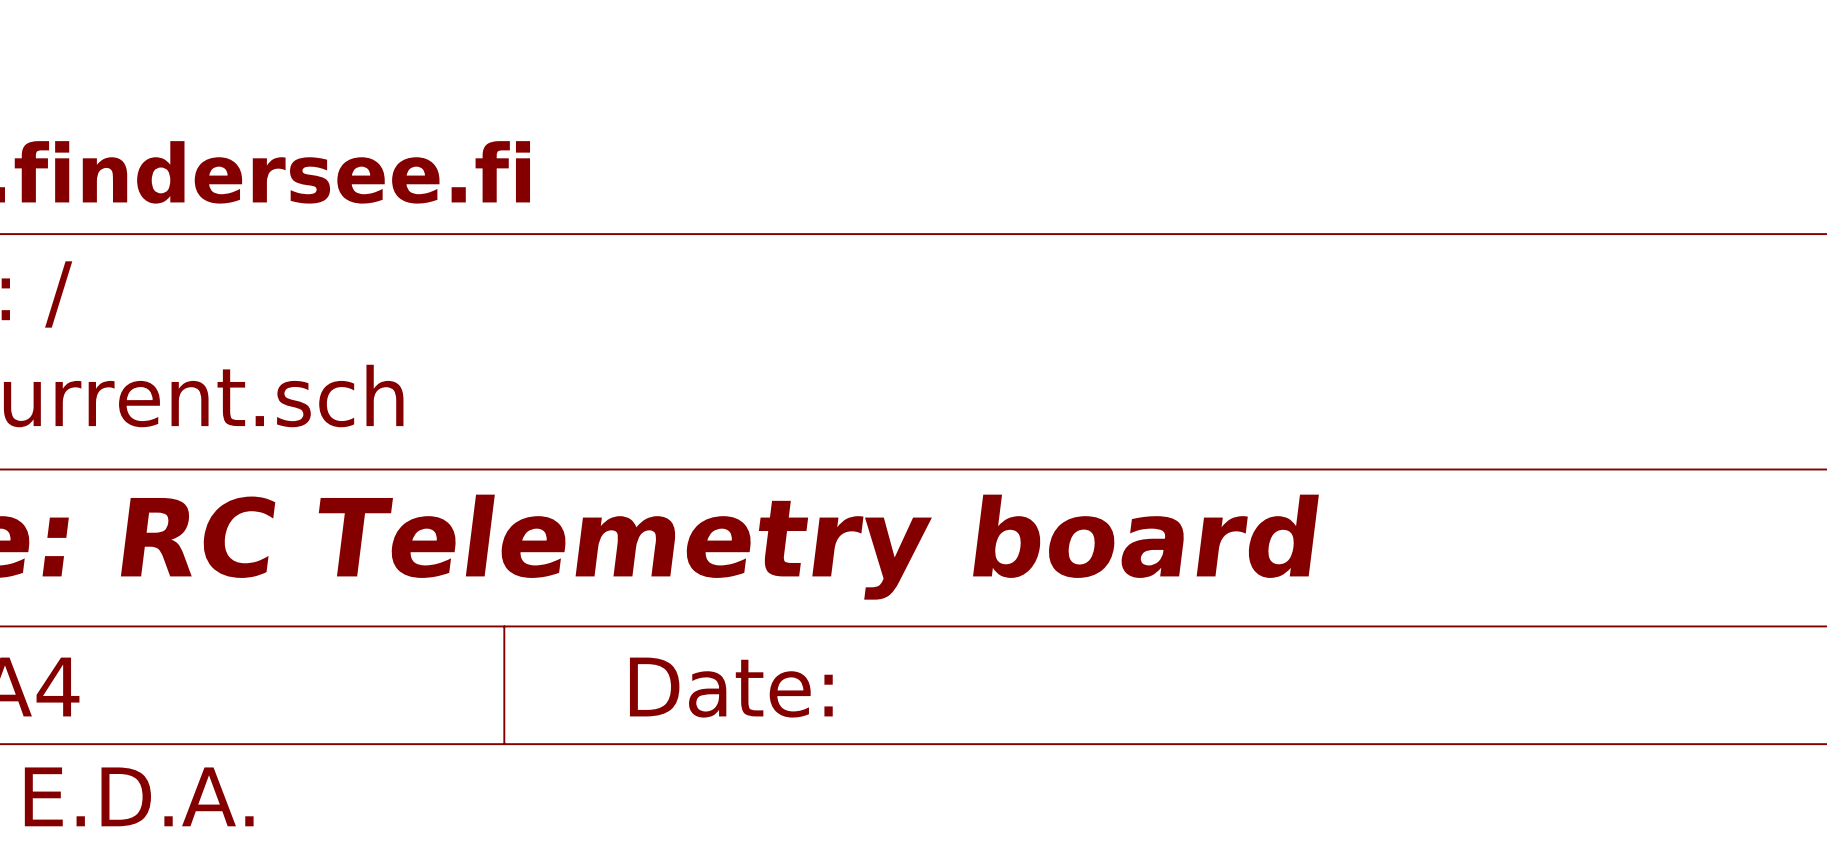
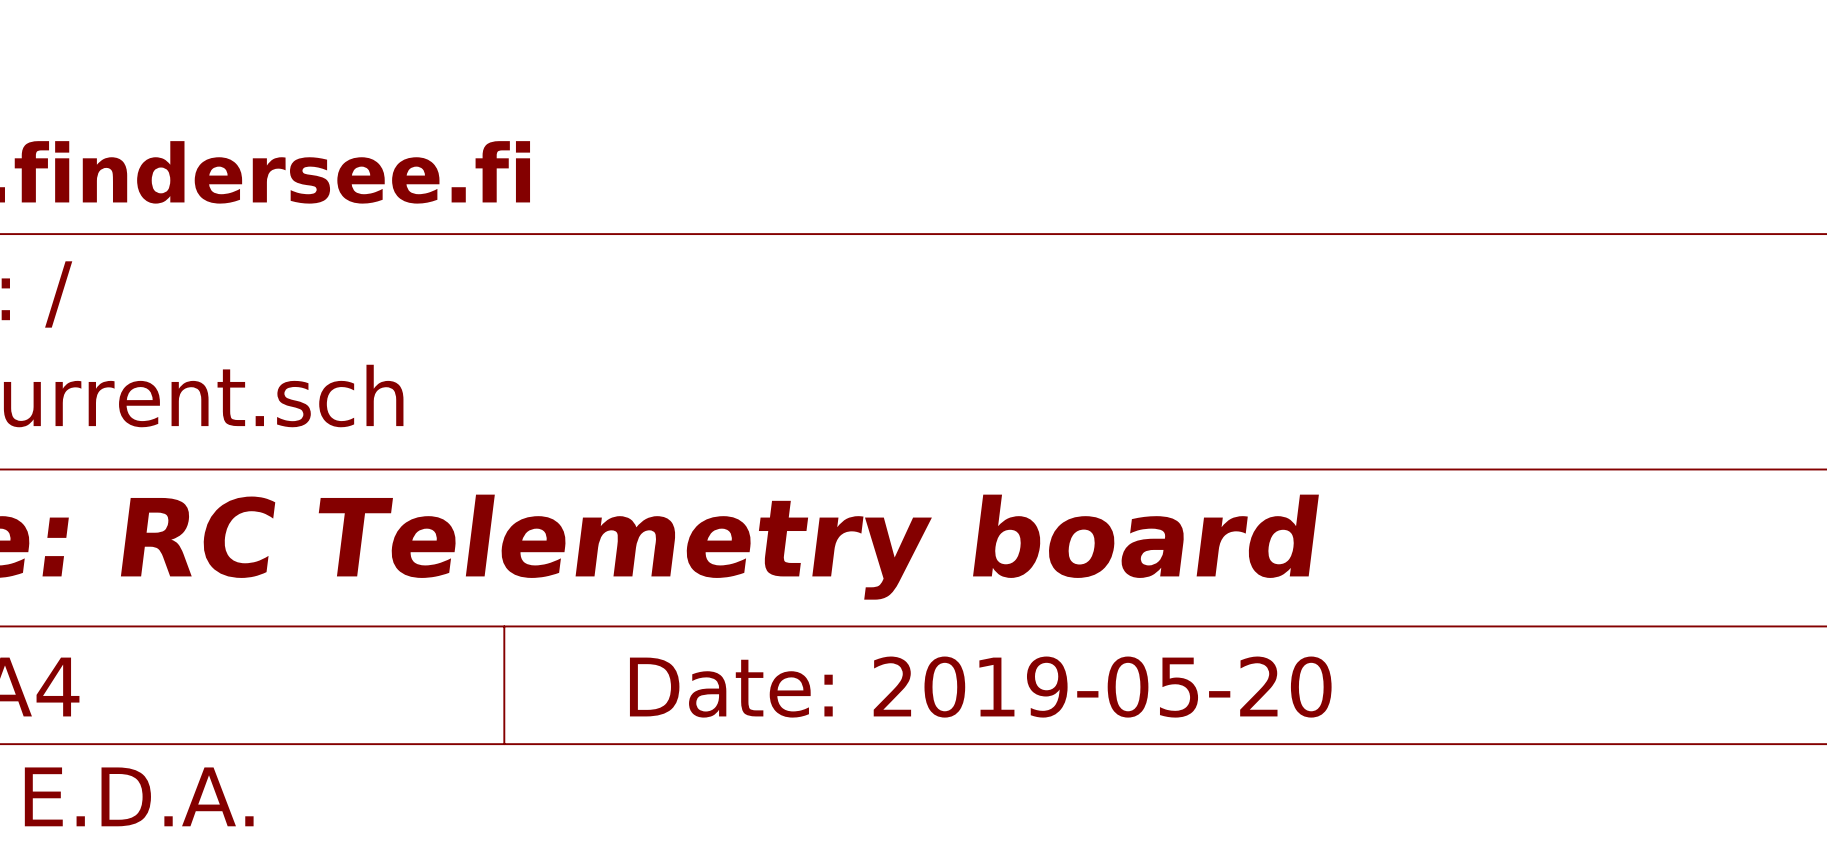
title block: Date: (731, 687) -> Date: 2019-05-20 (980, 687)

